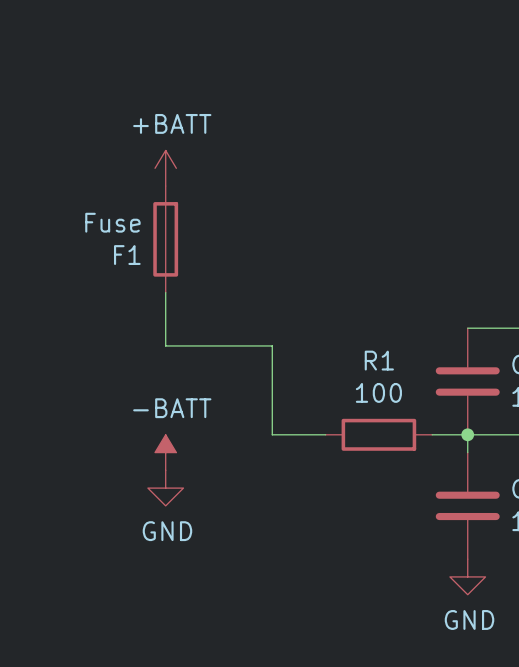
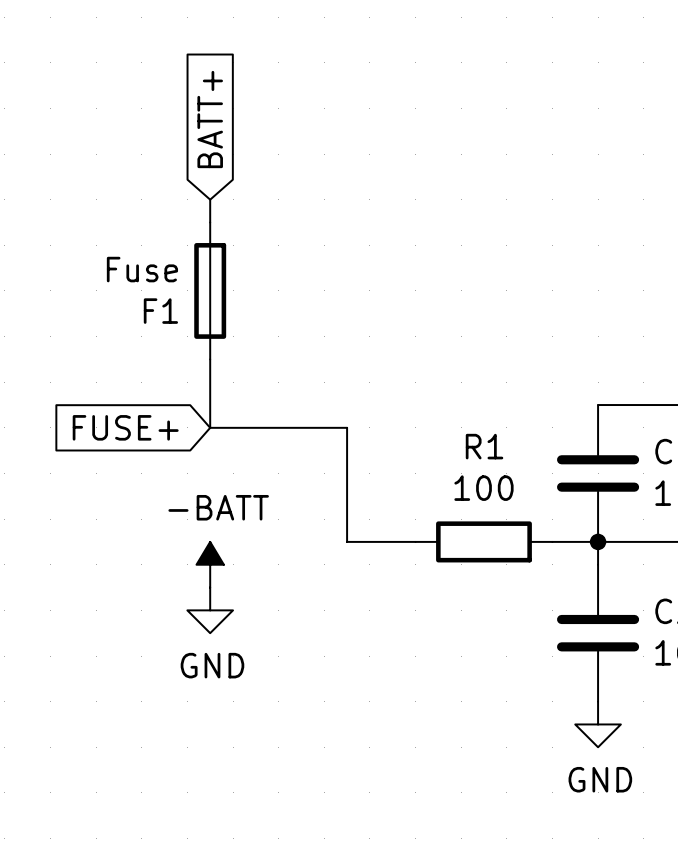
global label: none -> BATT+ (210, 119)
power symbol: +BATT (165, 168) -> none
global label: none -> FUSE+ (125, 427)

